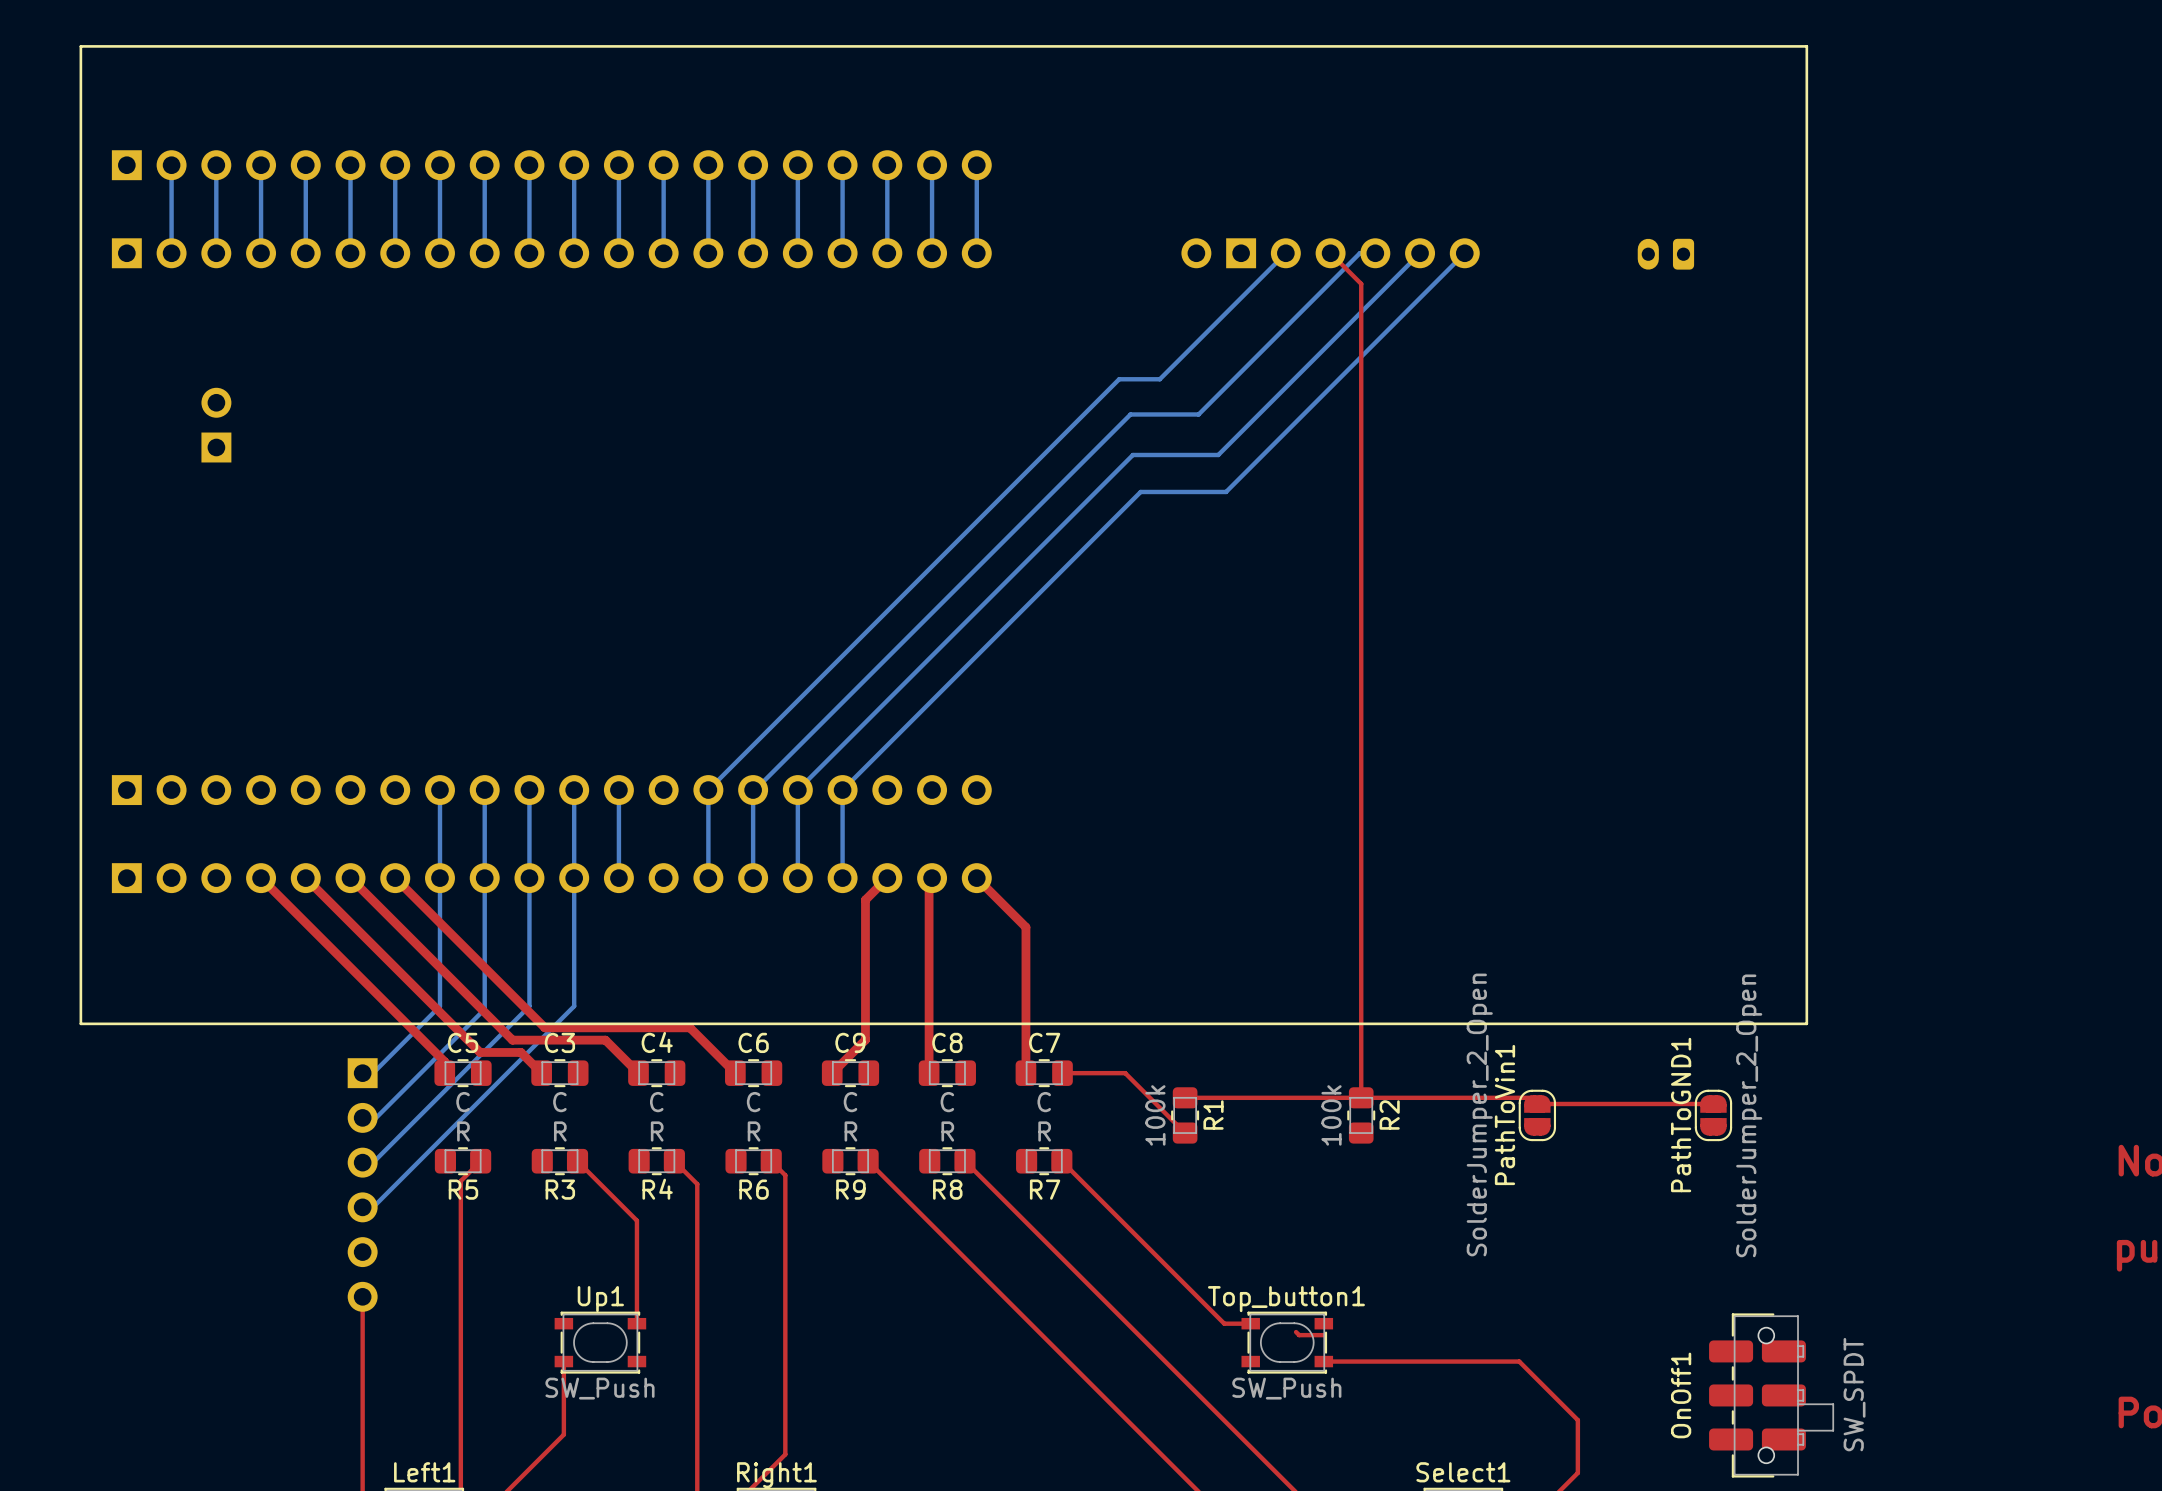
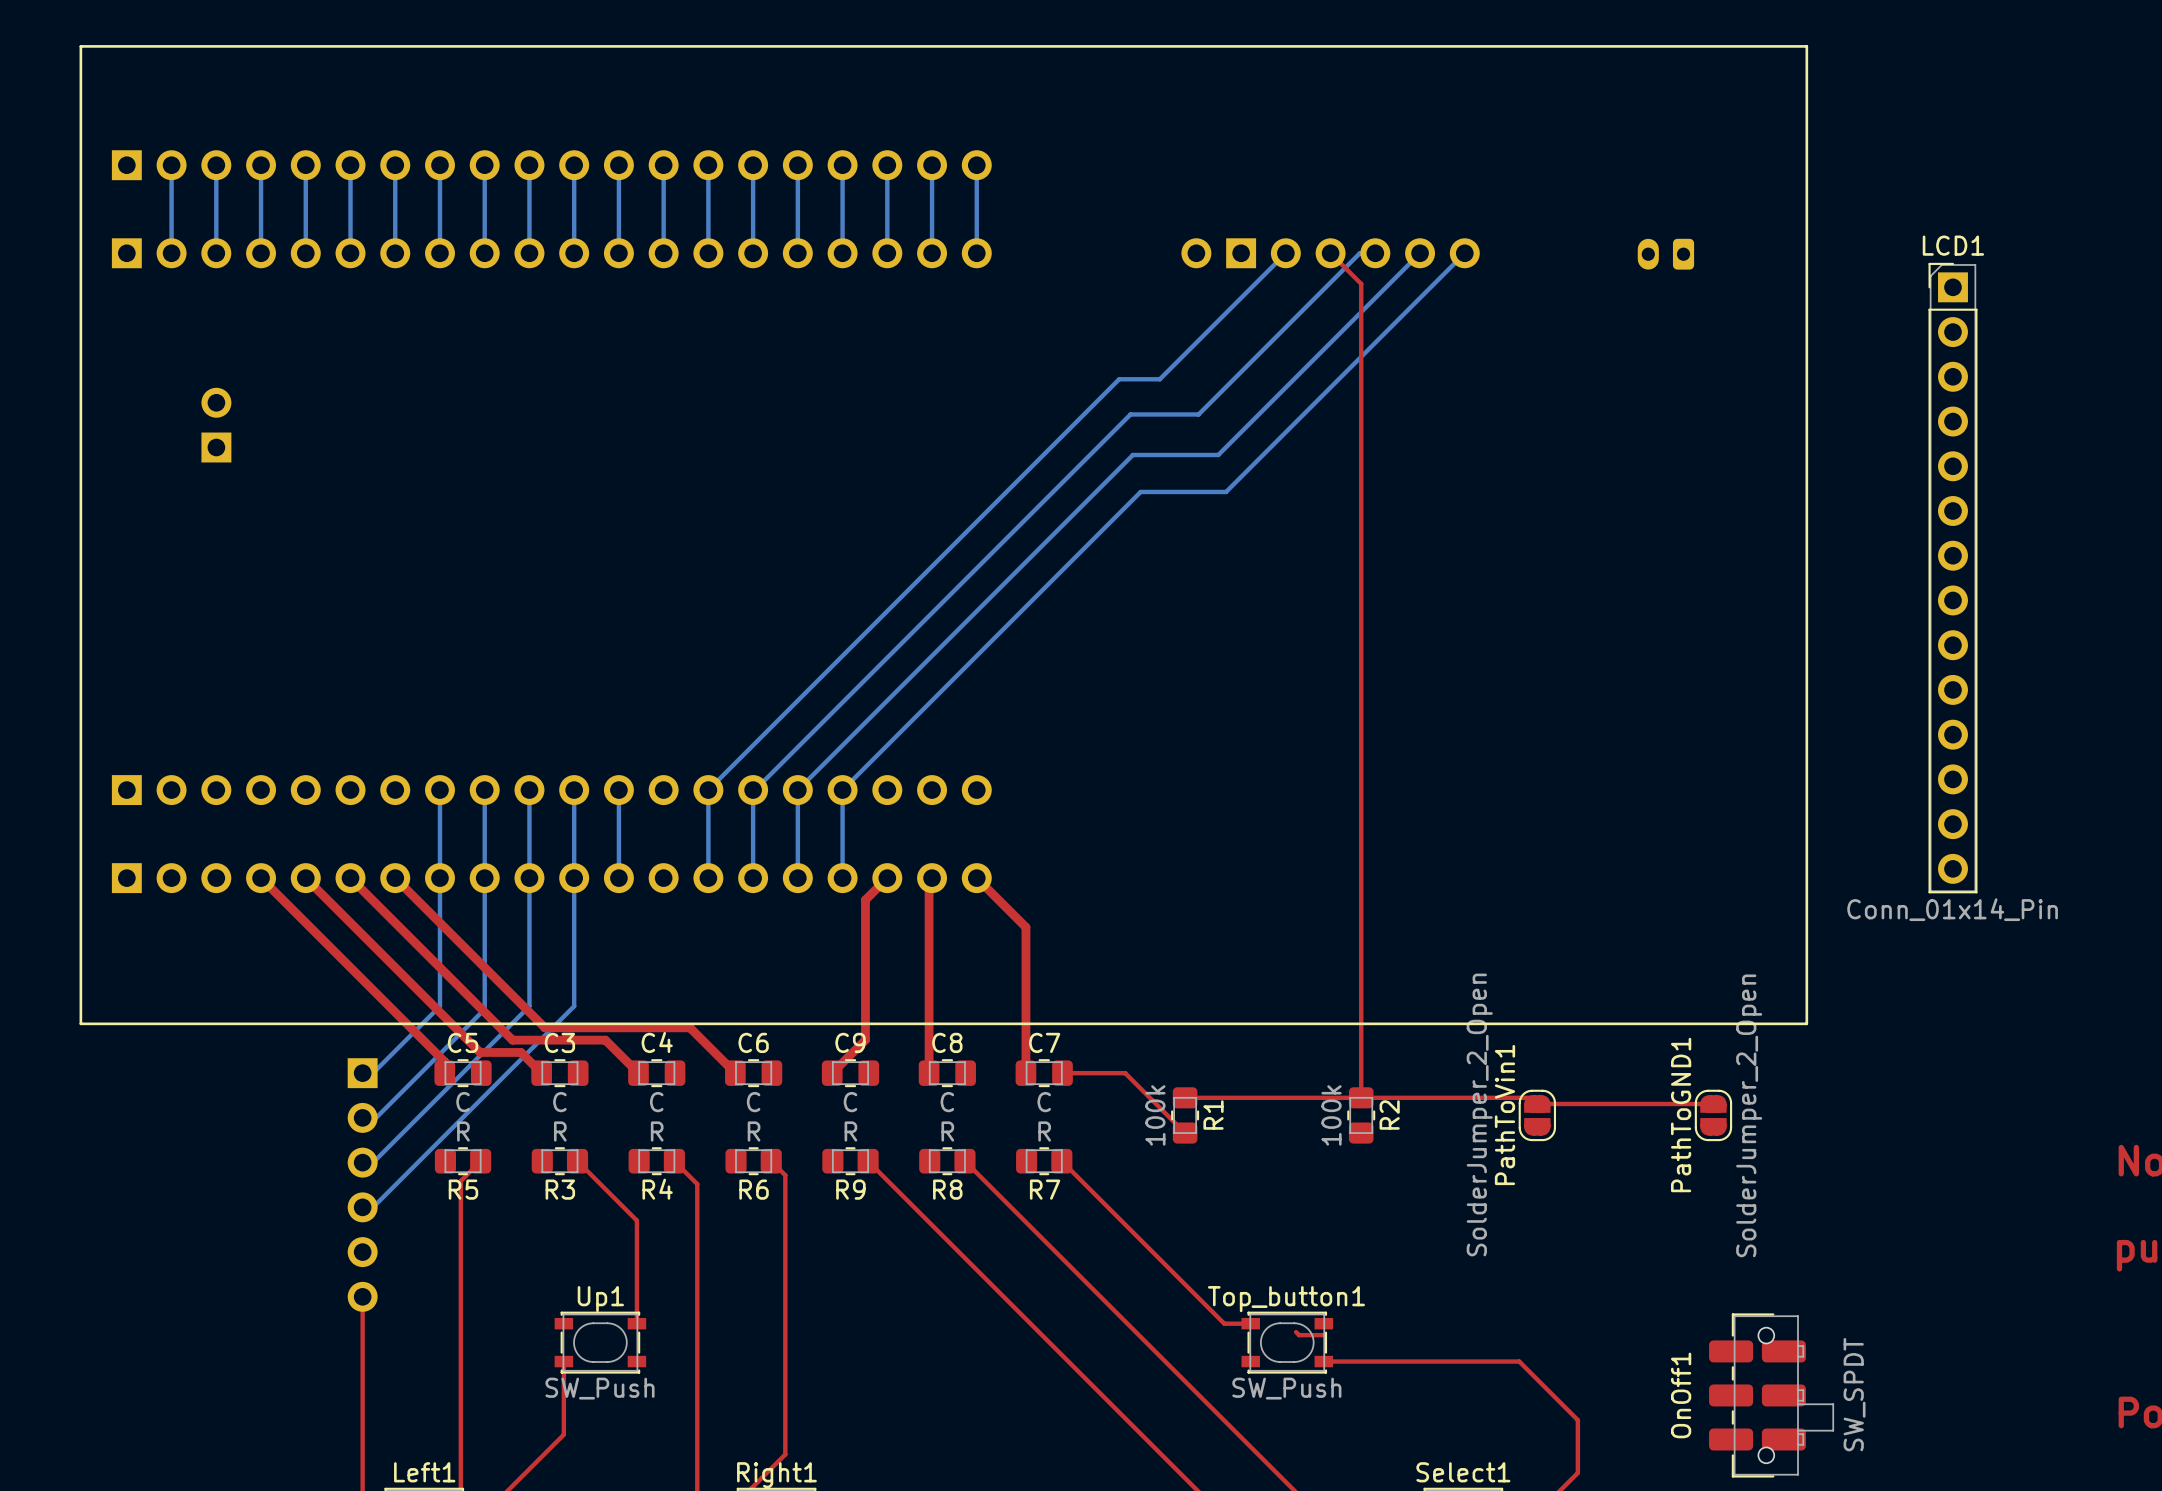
LCD1: none -> Conn_01x14_Pin (1952, 578)

